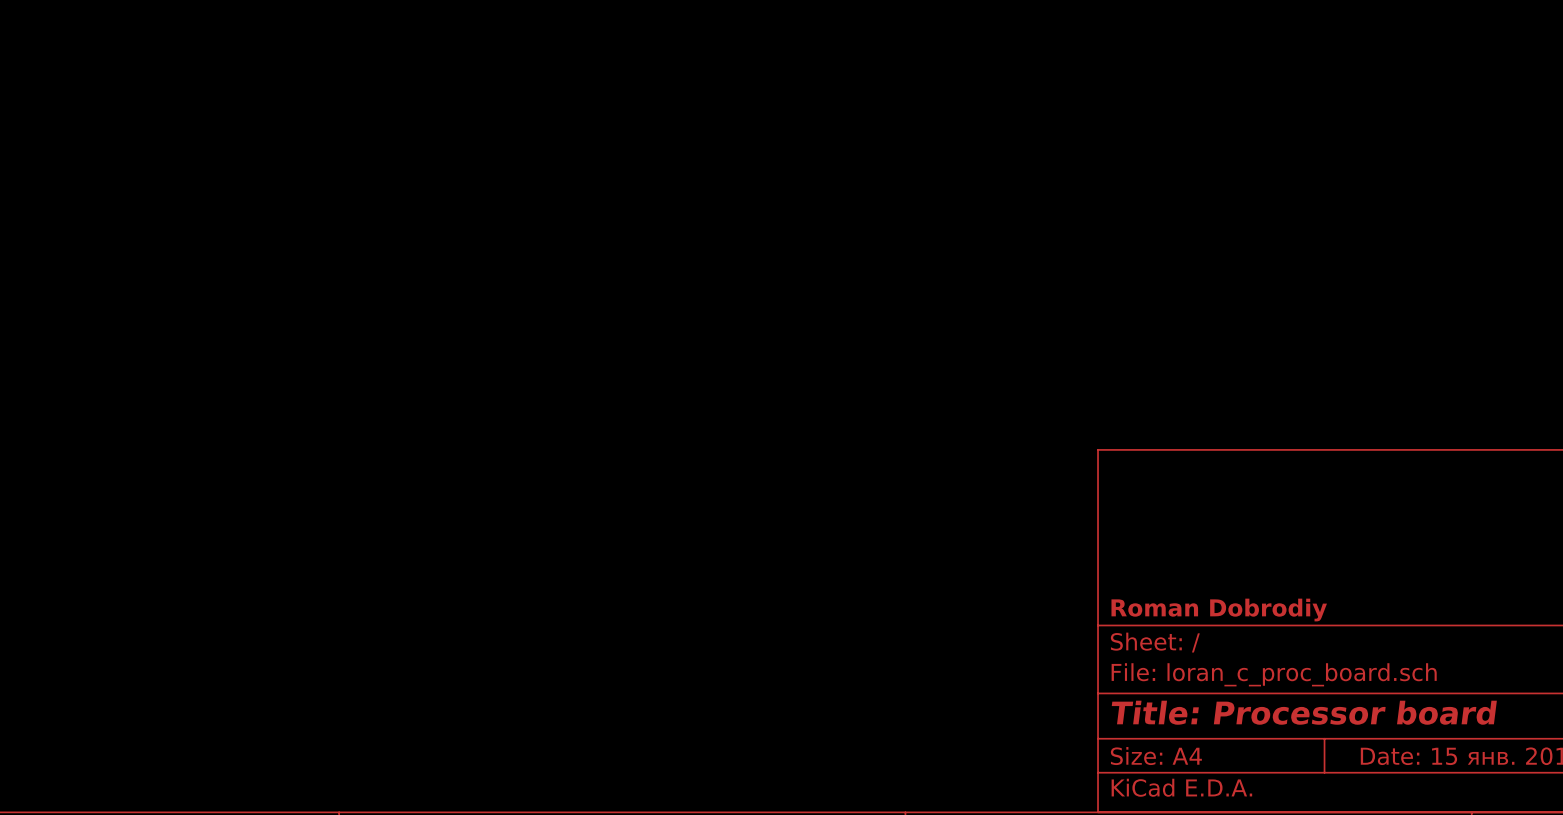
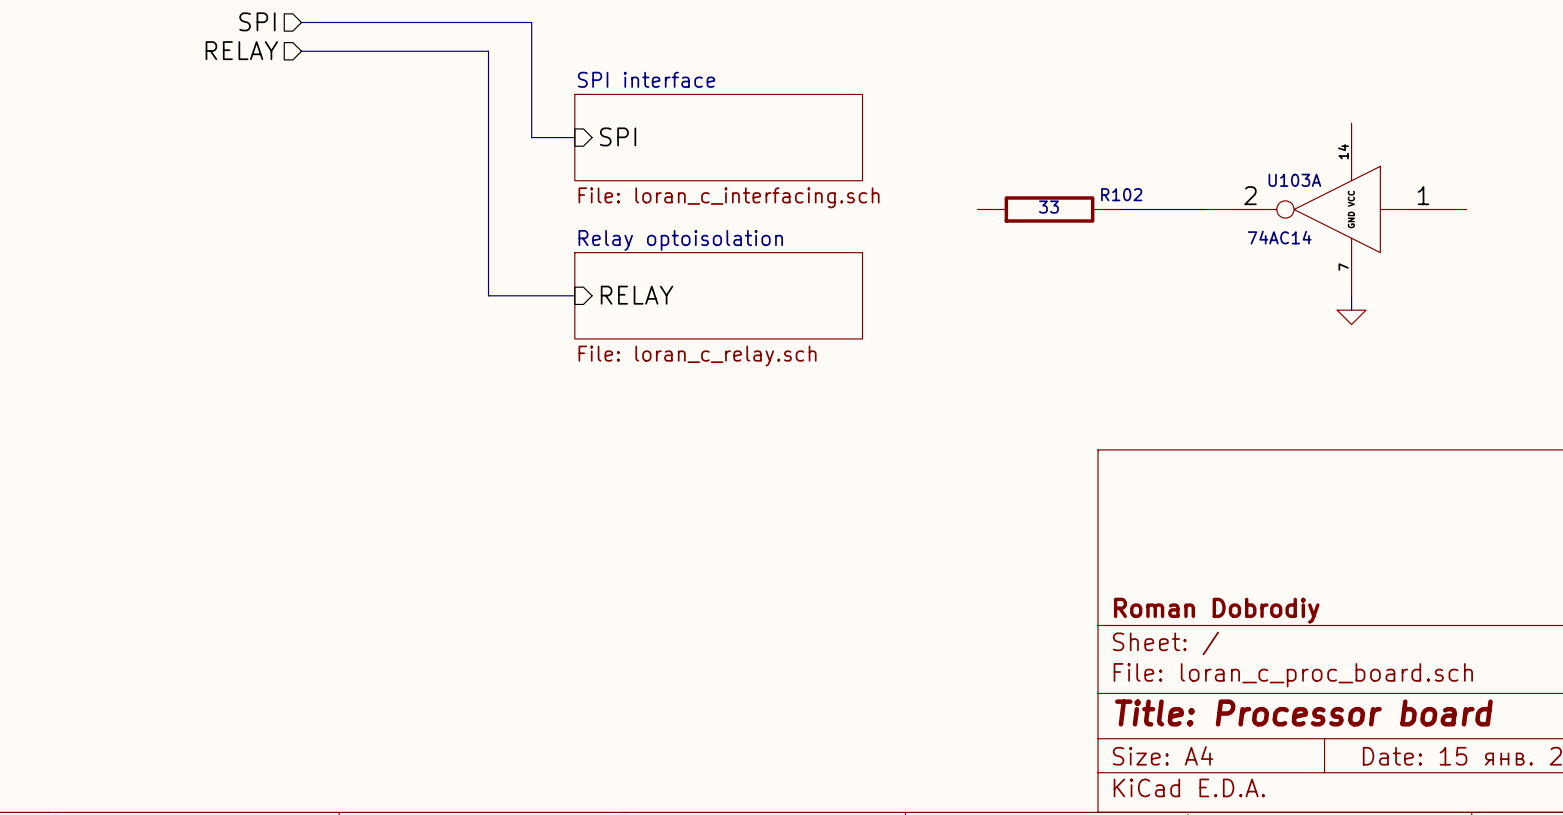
sheet pin: none -> SPI (257, 21)
bus: none -> (301, 22) (531, 22) (531, 137) (574, 137)
sheet pin: none -> RELAY (241, 50)
bus: none -> (301, 51) (488, 51) (488, 295) (574, 295)
sheet pin: none -> SPI (618, 136)
sheet SPI interface: none -> File: loran_c_interfacing.sch (718, 137)
R102: none -> 33 (1049, 209)
wire: none -> (1121, 209) (1207, 209)
U103A: none -> 74AC14 (1337, 209)
sheet pin: none -> RELAY (636, 295)
sheet Relay optoisolation: none -> File: loran_c_relay.sch (718, 295)
wire: none -> (1351, 295) (1351, 310)
power symbol: none -> (1351, 317)

